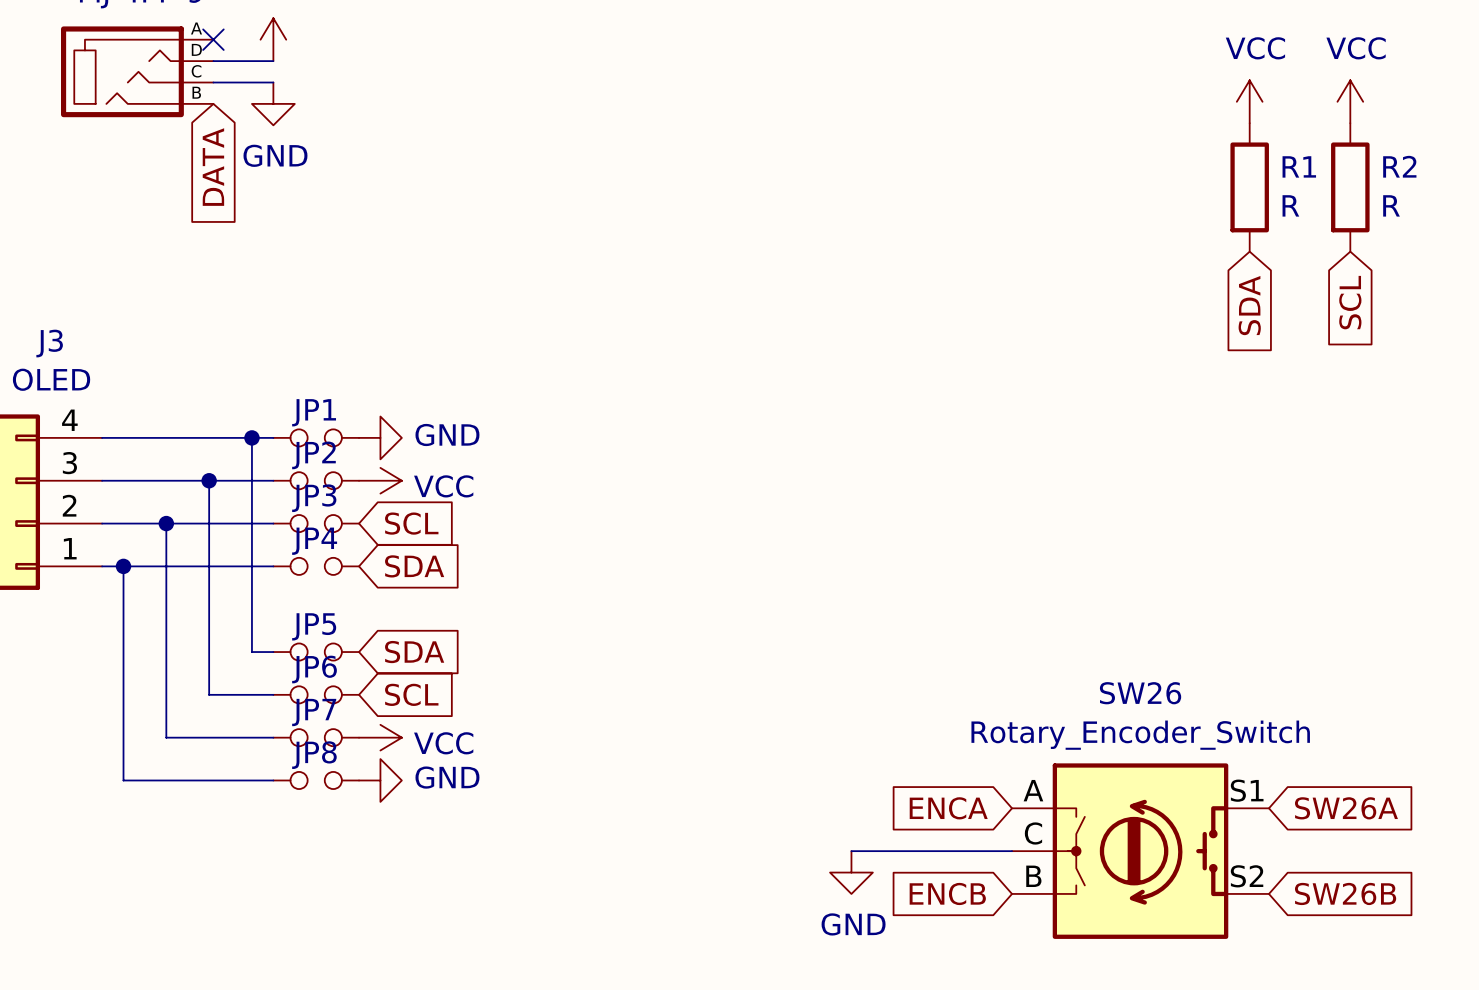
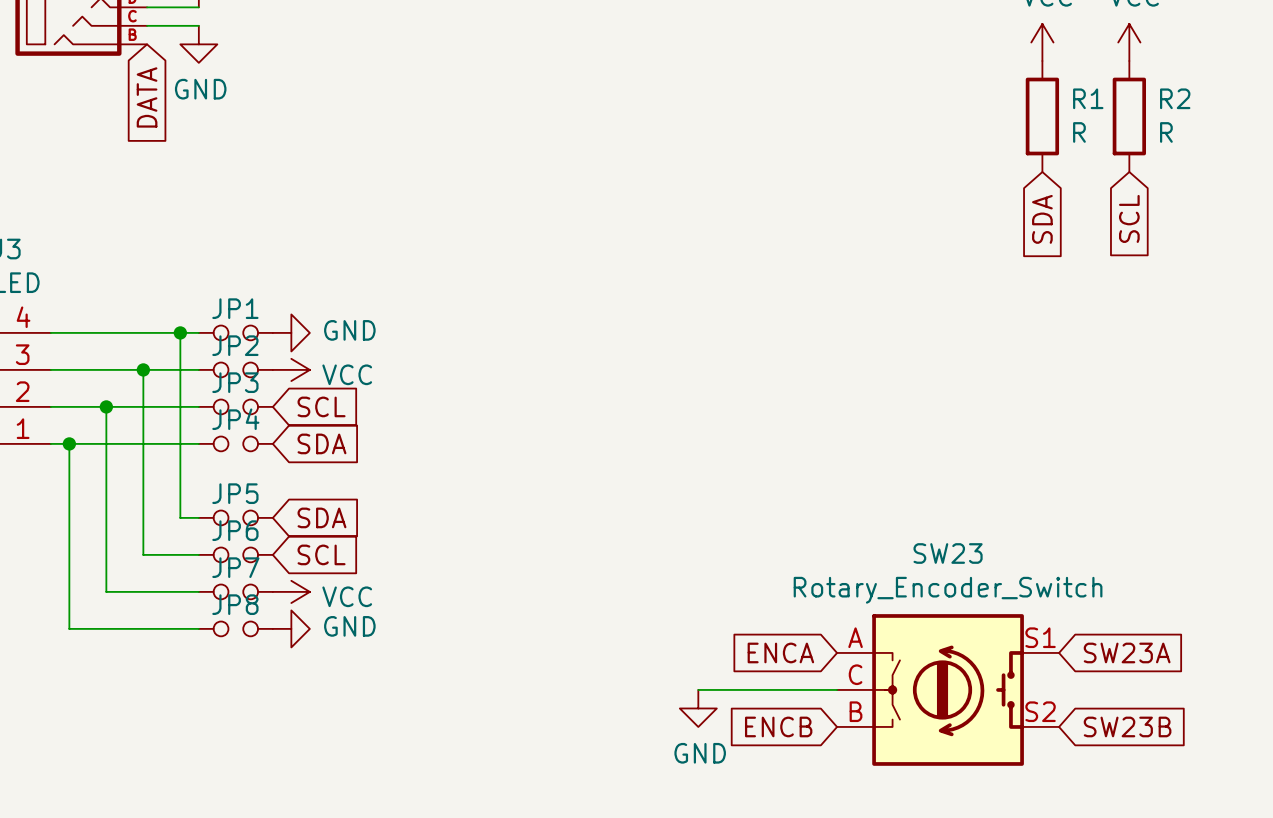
SW26 name: SW26 (1140, 693) -> SW23 (948, 553)
global label: SW26A (1346, 808) -> SW23A (1127, 652)
global label: SW26B (1345, 893) -> SW23B (1127, 726)

